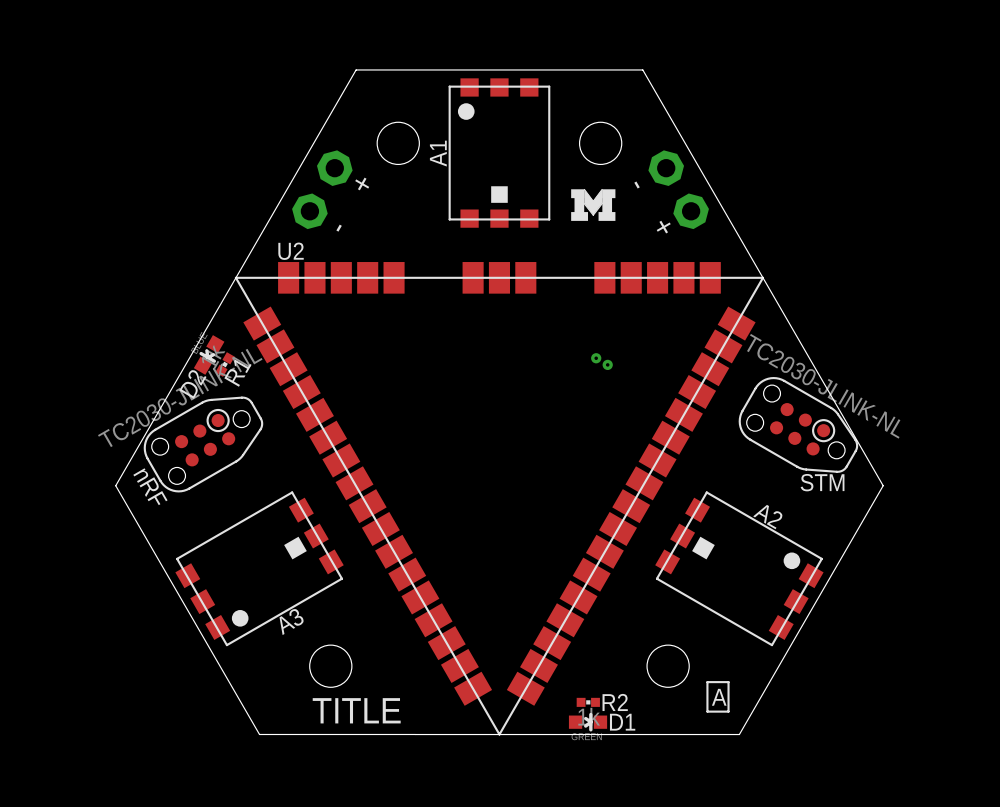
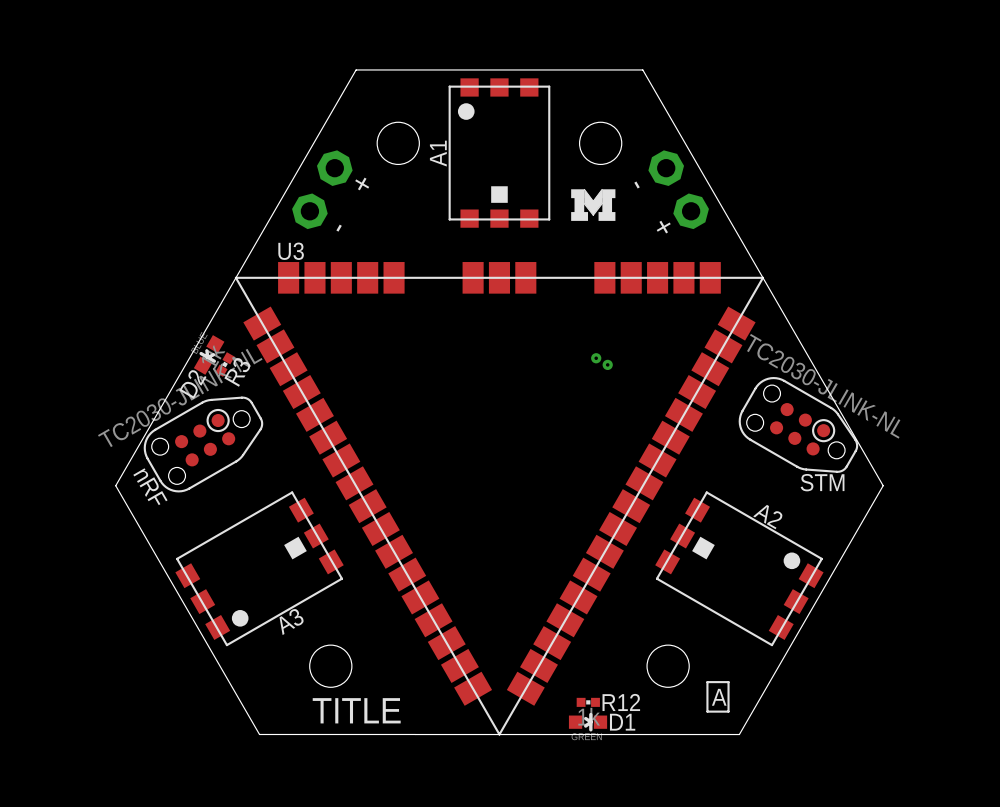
U2 name: U2 (291, 251) -> U3 (291, 251)
R1 name: R1 (237, 373) -> R3 (237, 372)
R2 name: R2 (615, 702) -> R12 (621, 702)

